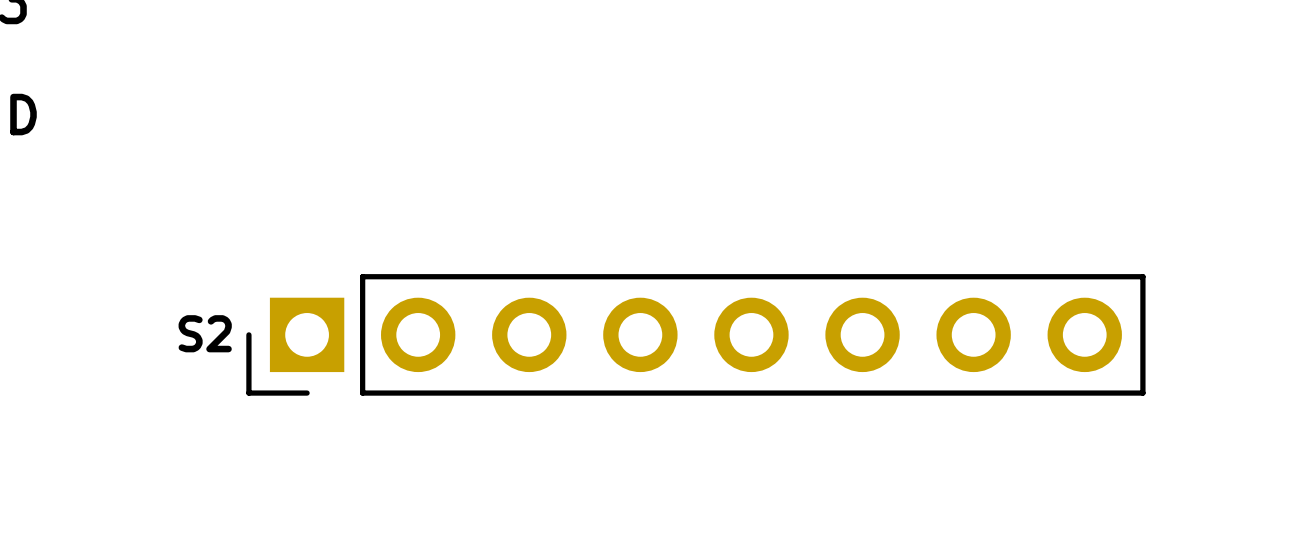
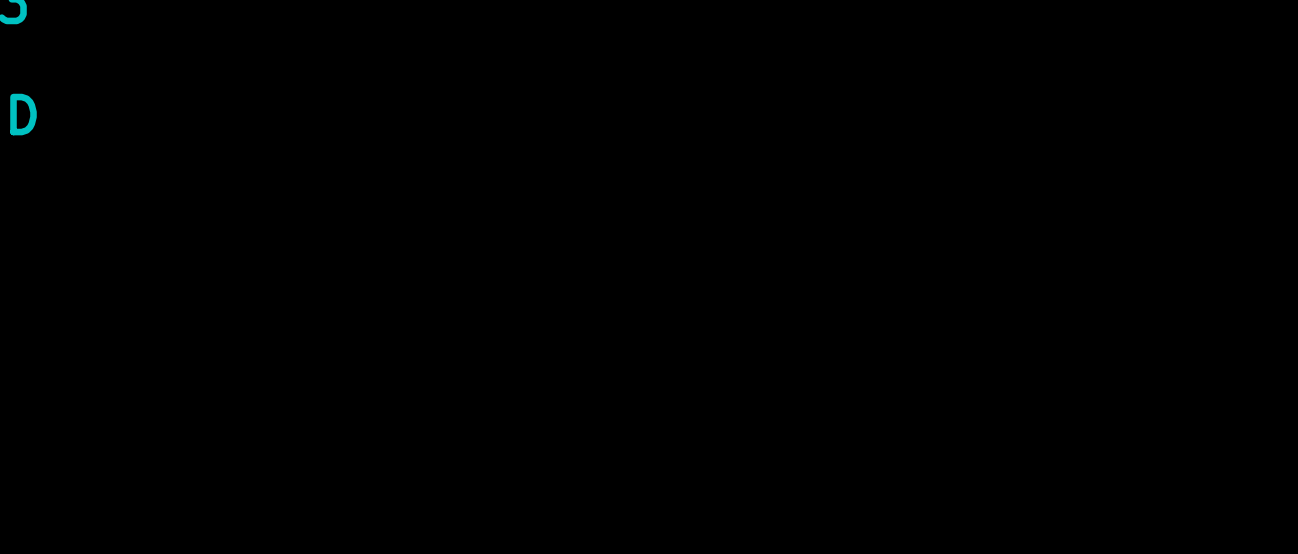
S2: (695, 334) -> none

